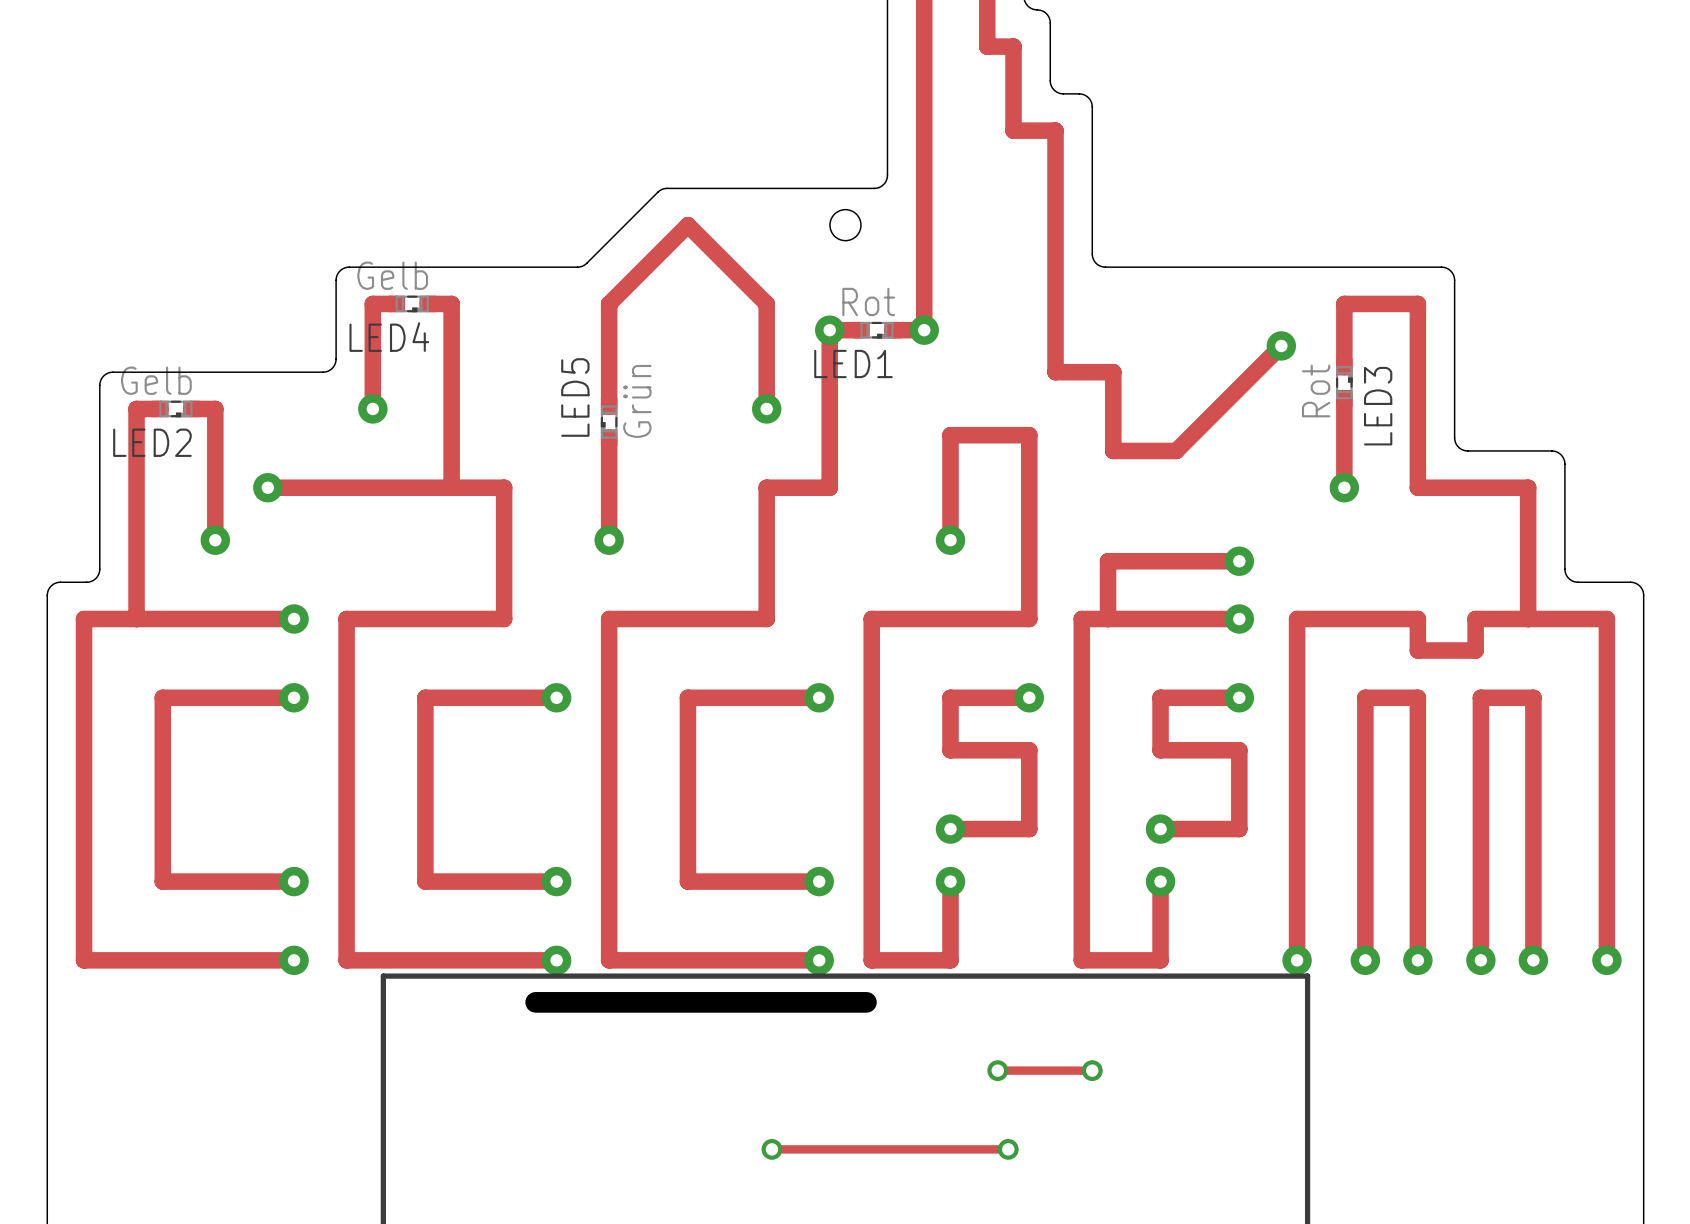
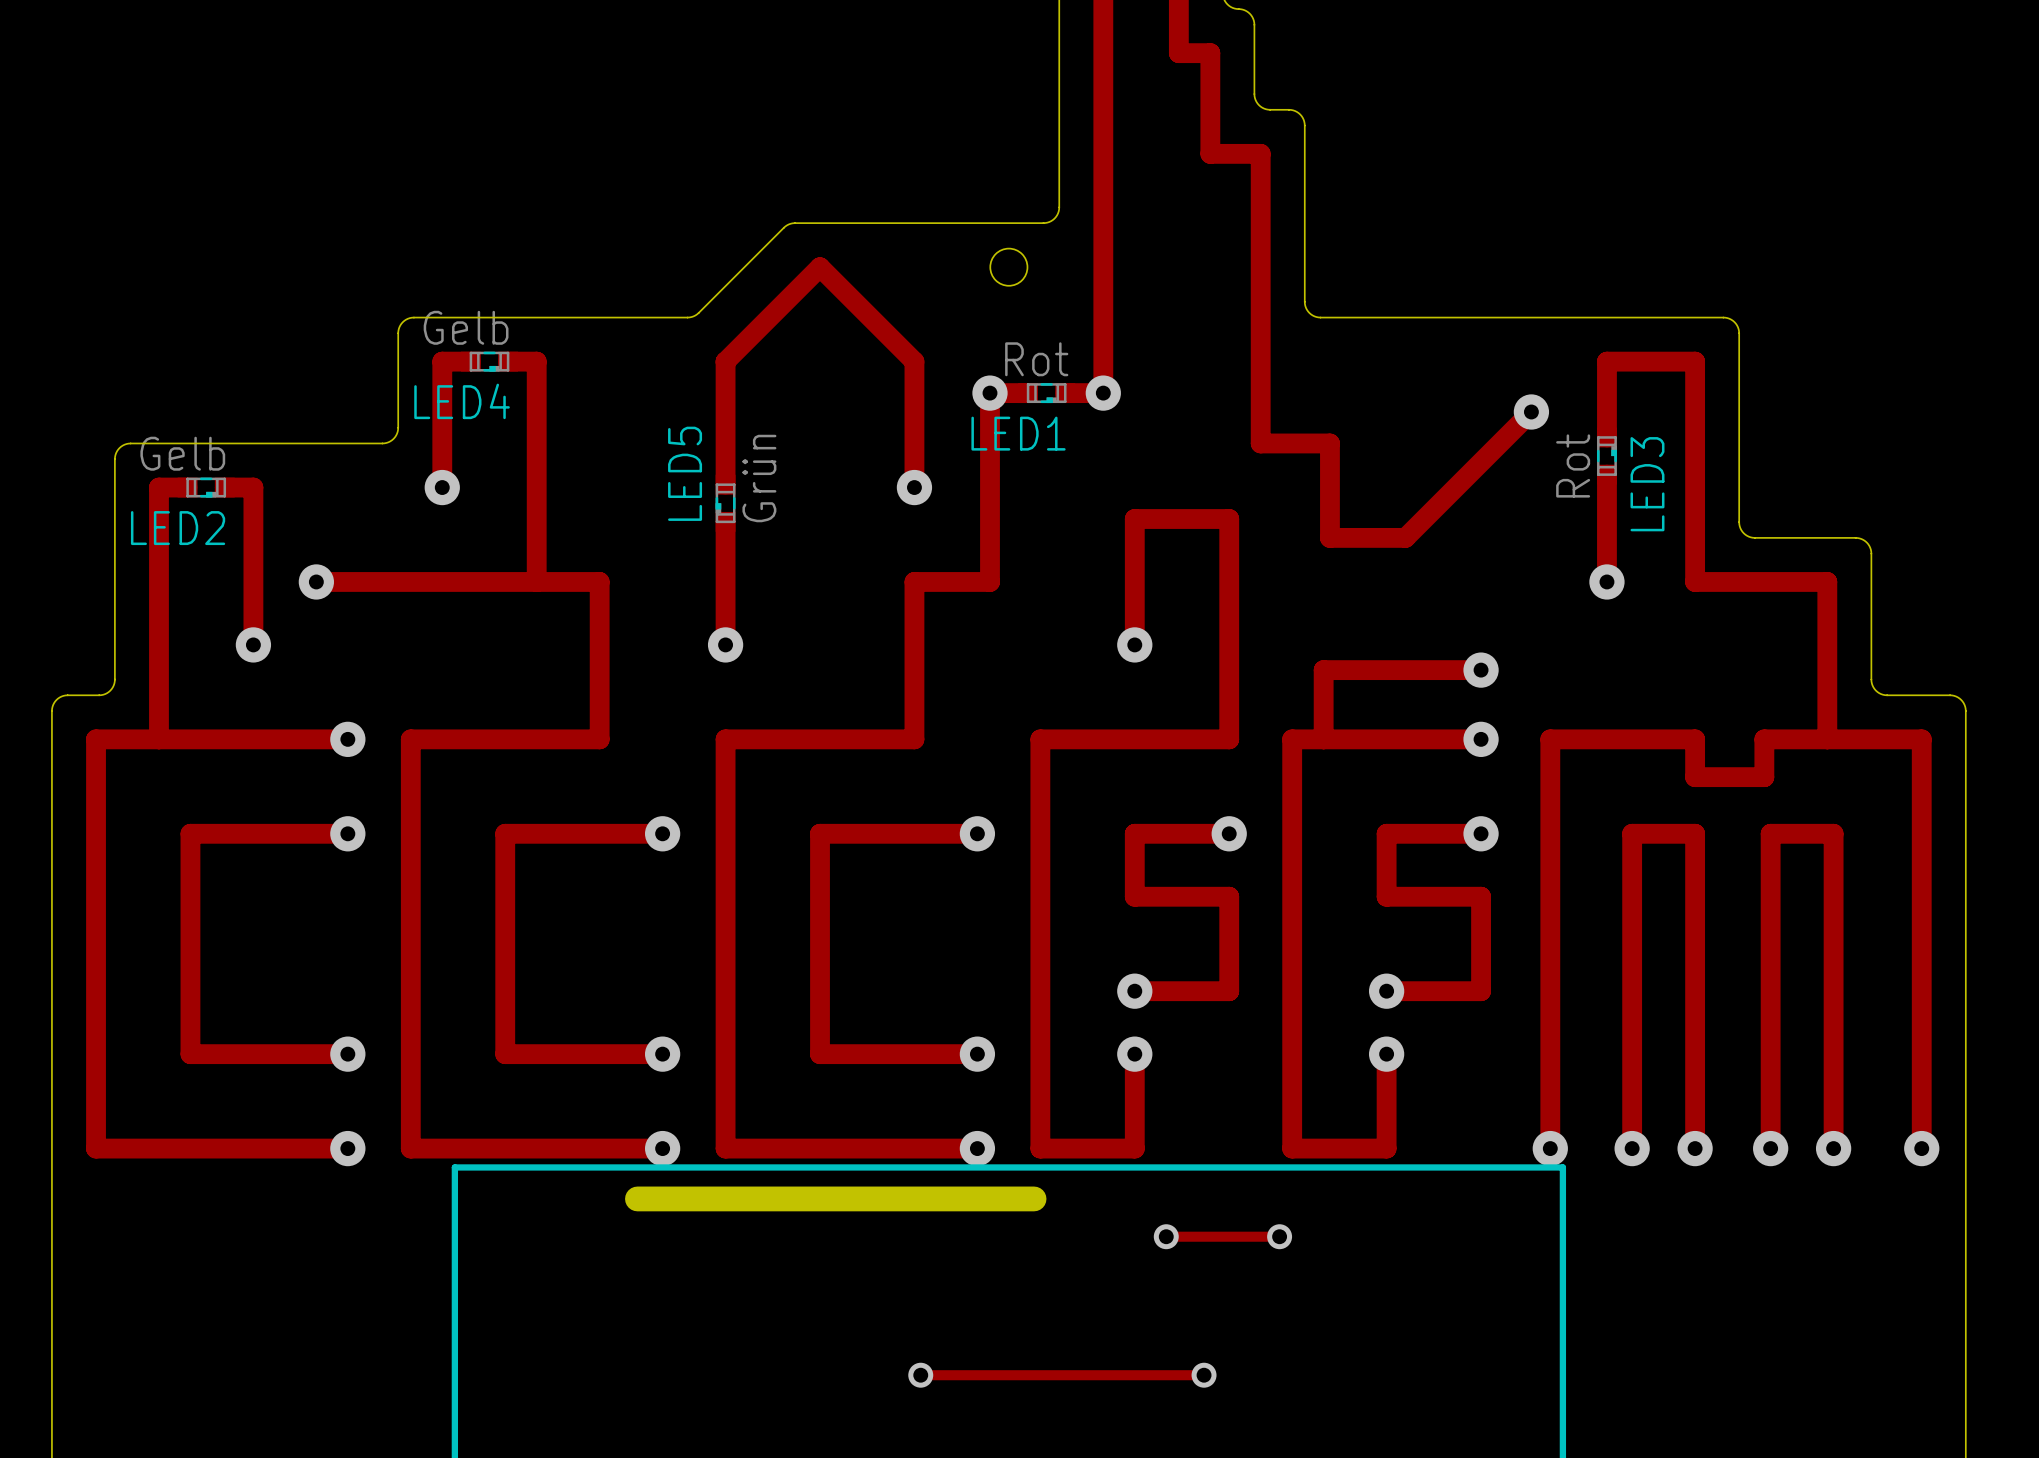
via: none -> (1166, 1236)
via: none -> (1279, 1236)
track: (997, 1070) (1092, 1070) -> (1166, 1236) (1279, 1236)
via: (997, 1070) -> none
via: (1092, 1070) -> none

